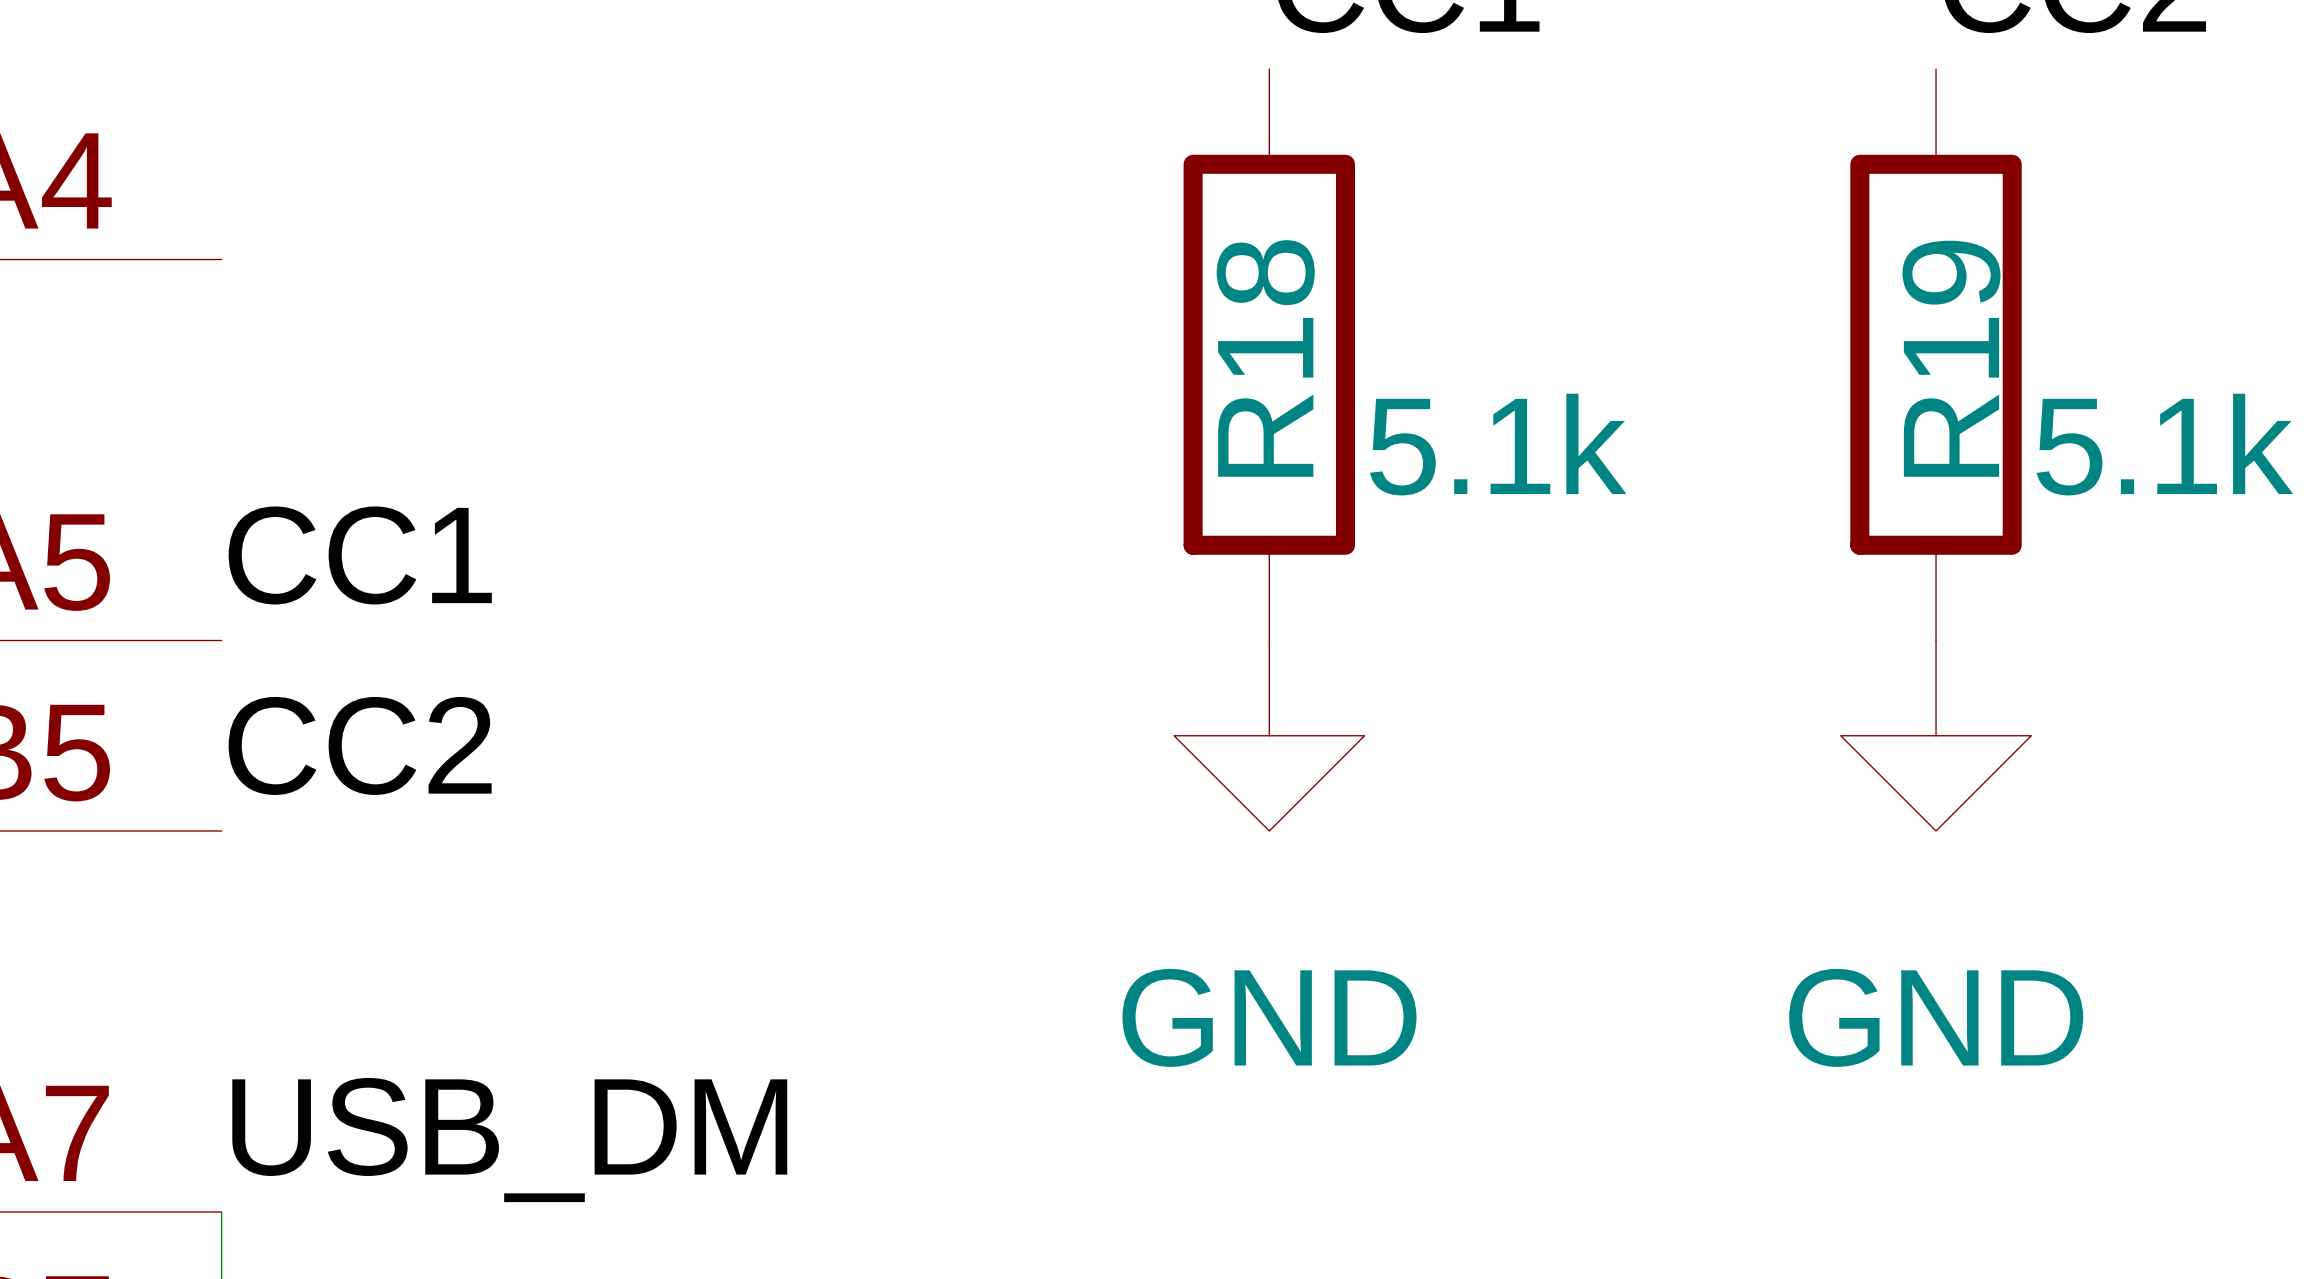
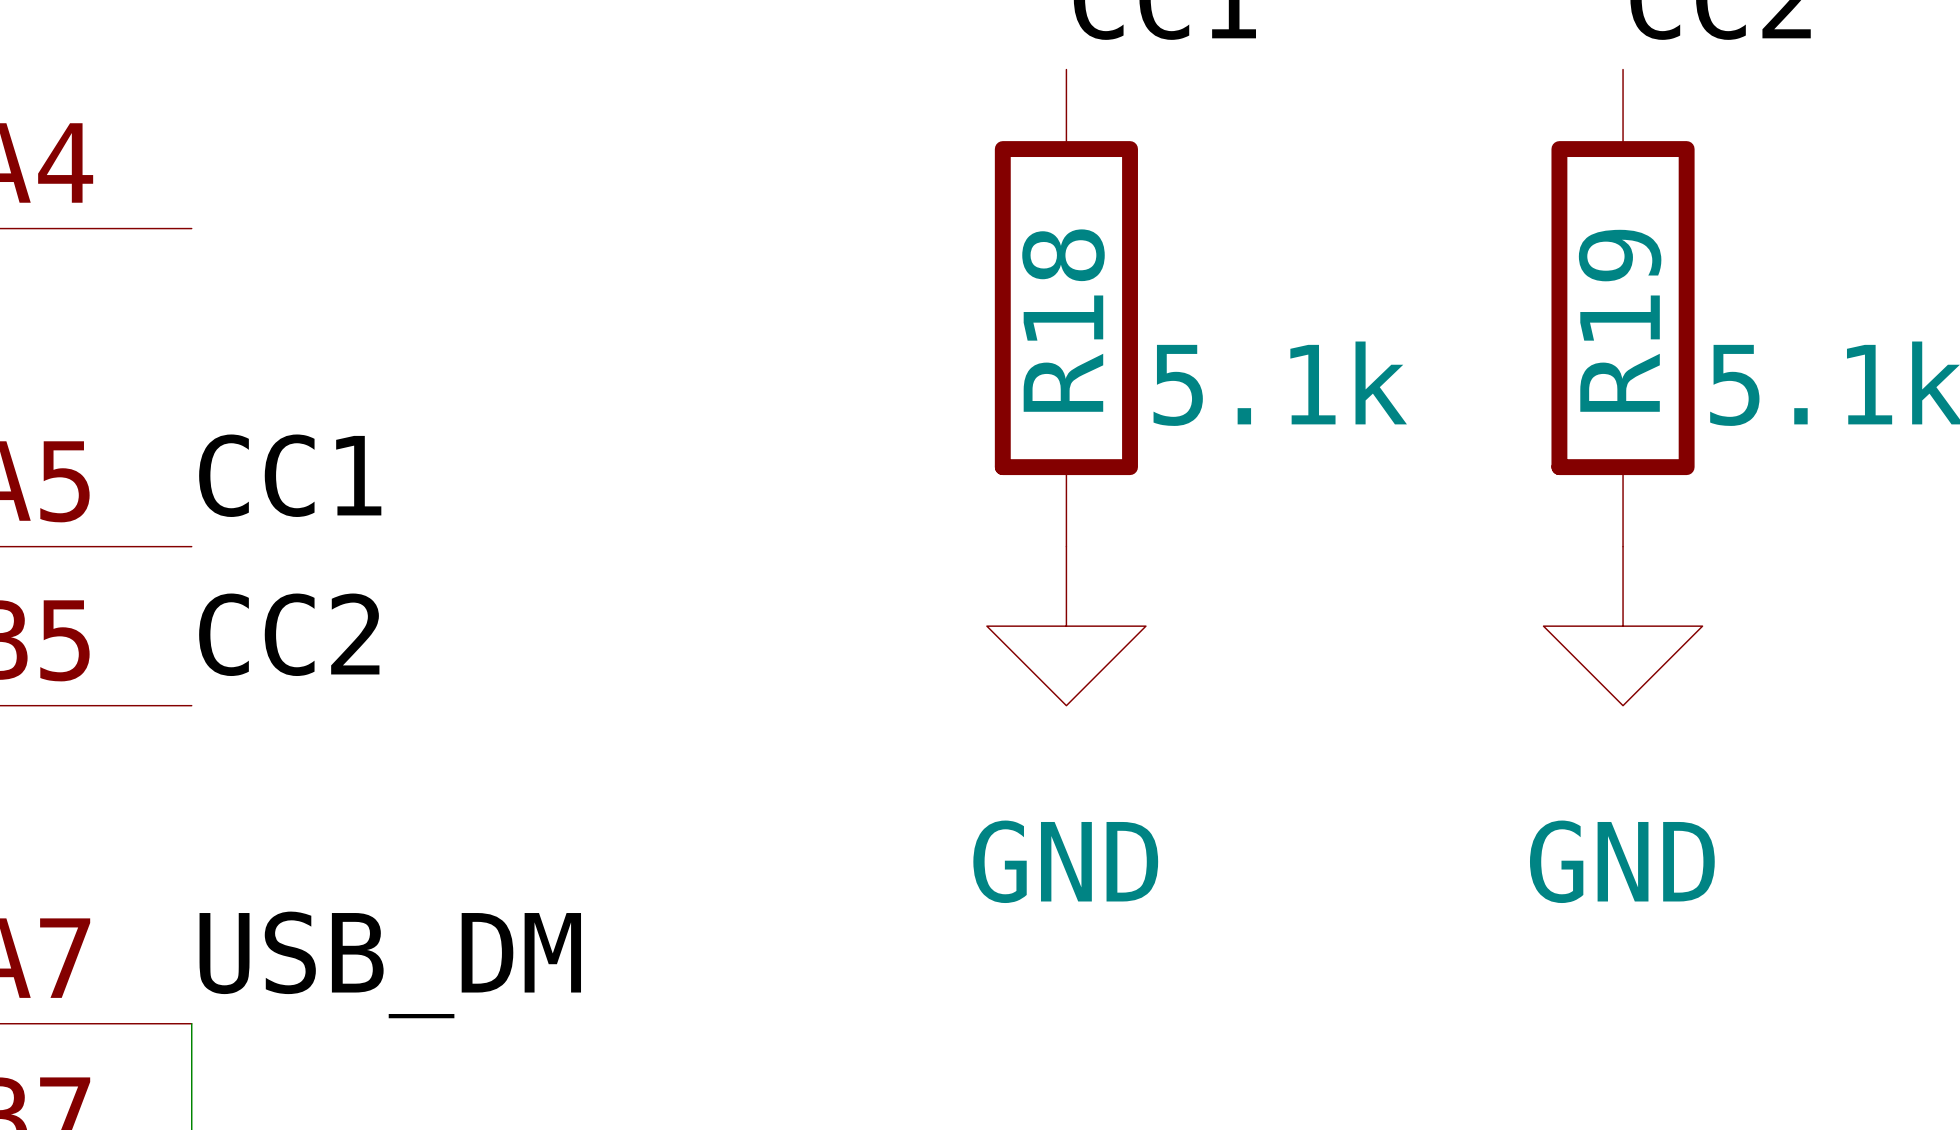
R19 name position: R19 (1951, 358) -> R19 (1620, 320)

